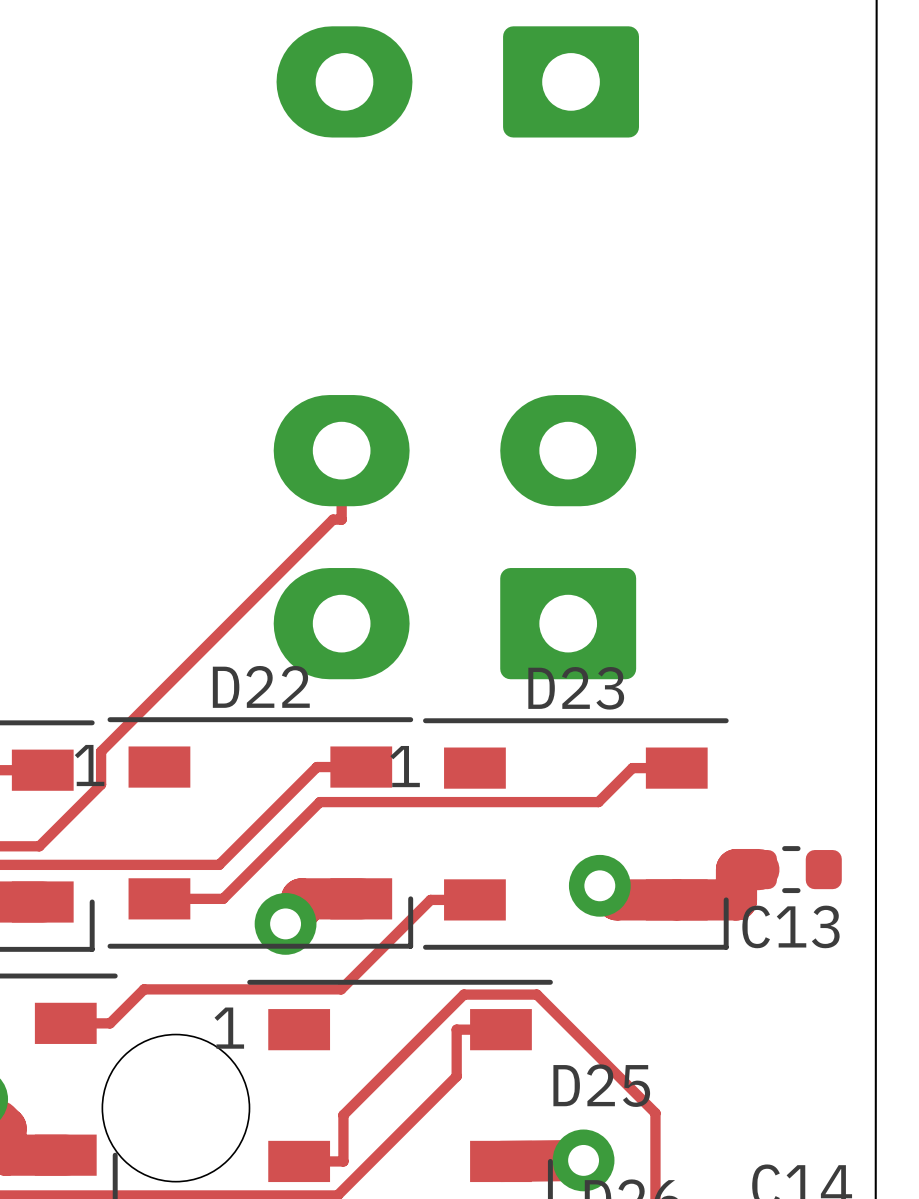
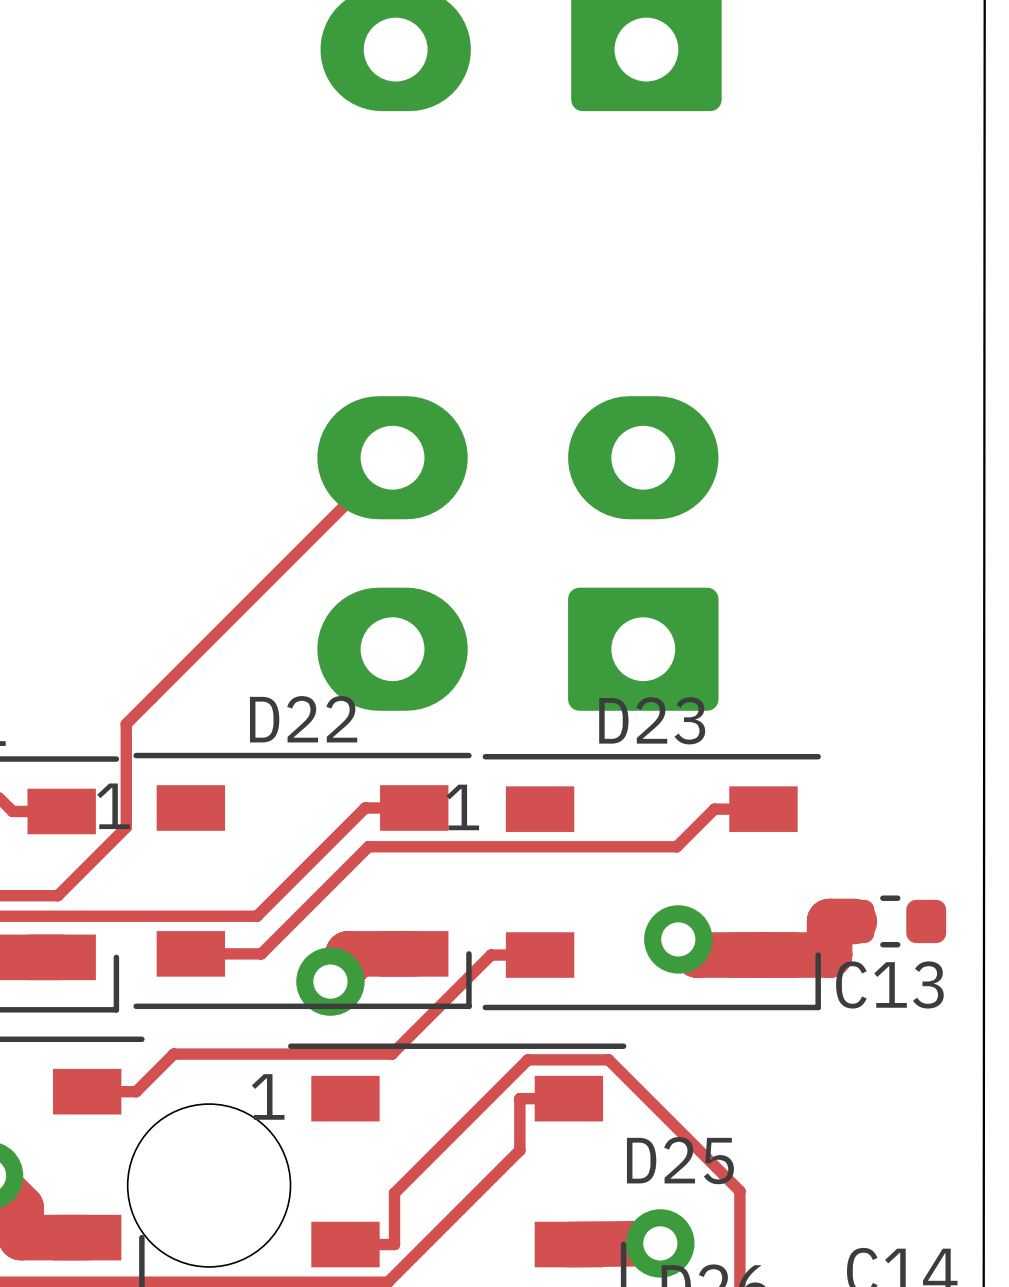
track: (341, 450) (341, 519) (333, 519) (101, 751) -> (392, 457) (126, 724) (126, 790)

